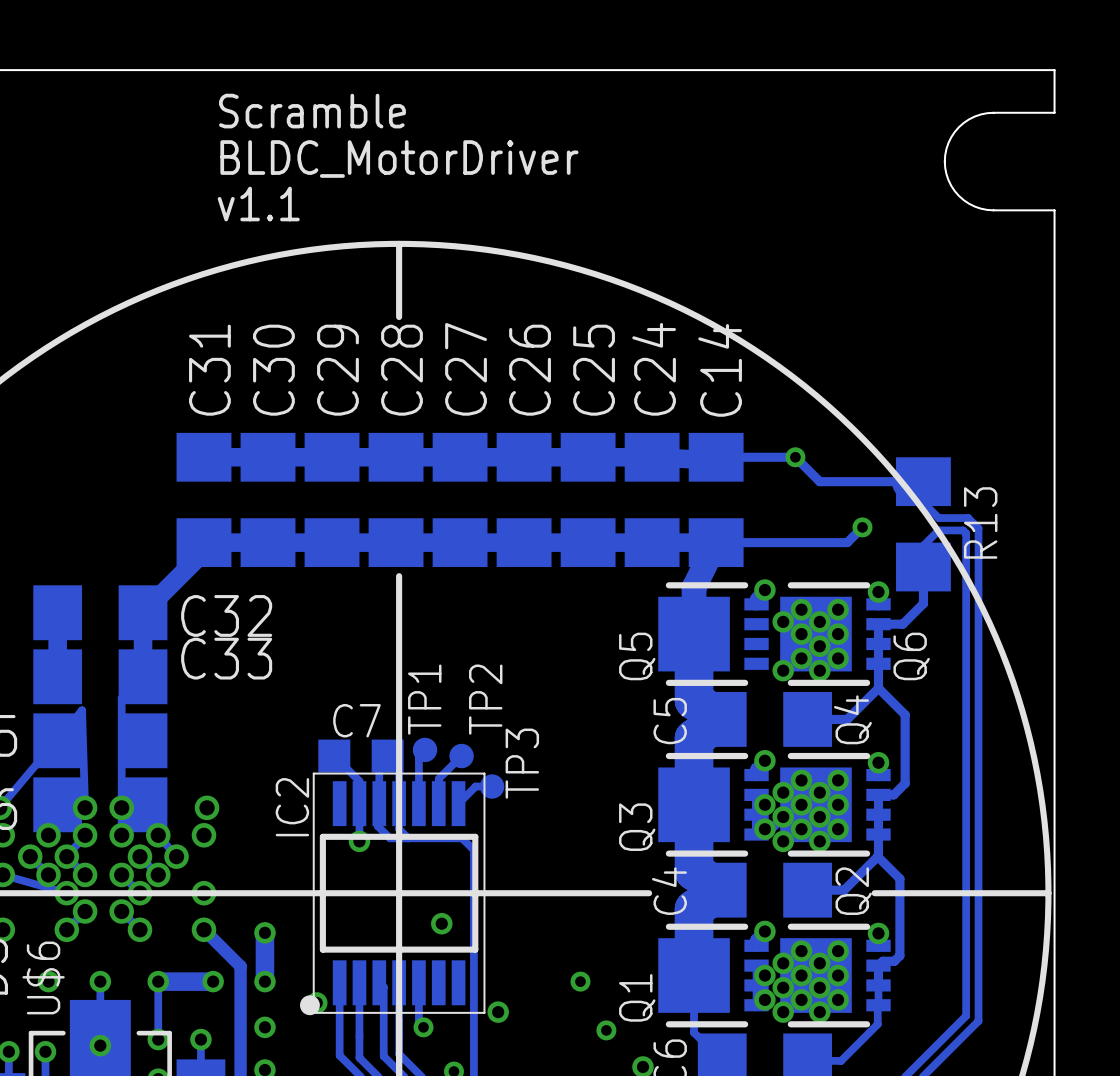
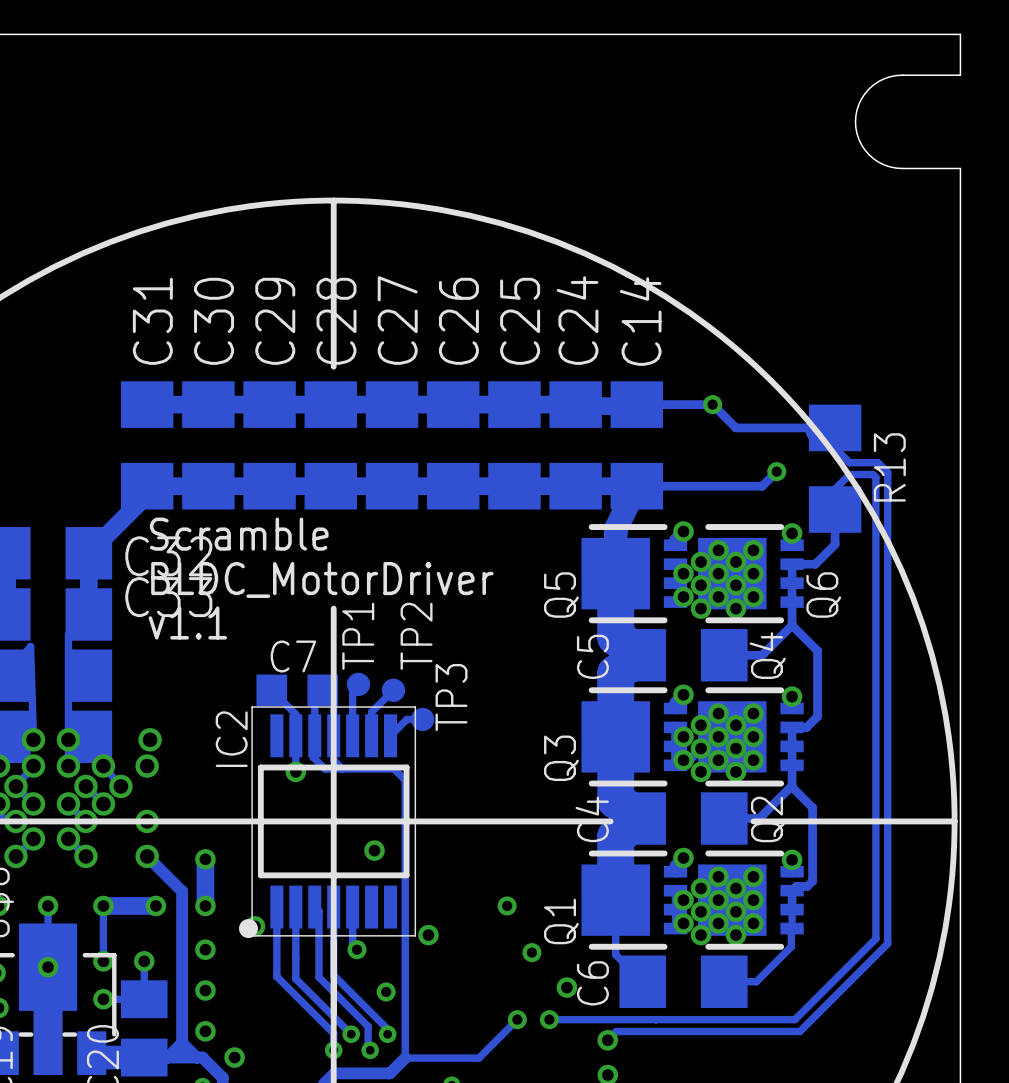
text position: Scramble (312, 111) -> Scramble (239, 534)
text position: BLDC_MotorDriver (399, 159) -> BLDC_MotorDriver (322, 579)
text position: v1.1 (258, 203) -> v1.1 (187, 622)
line: none -> (333, 270) (333, 366)
line: (399, 576) (399, 670) -> none
via: none -> (683, 573)
via: none -> (701, 585)
via: none -> (683, 596)
line: none -> (610, 821) (572, 821)
line: none -> (788, 821) (753, 821)

